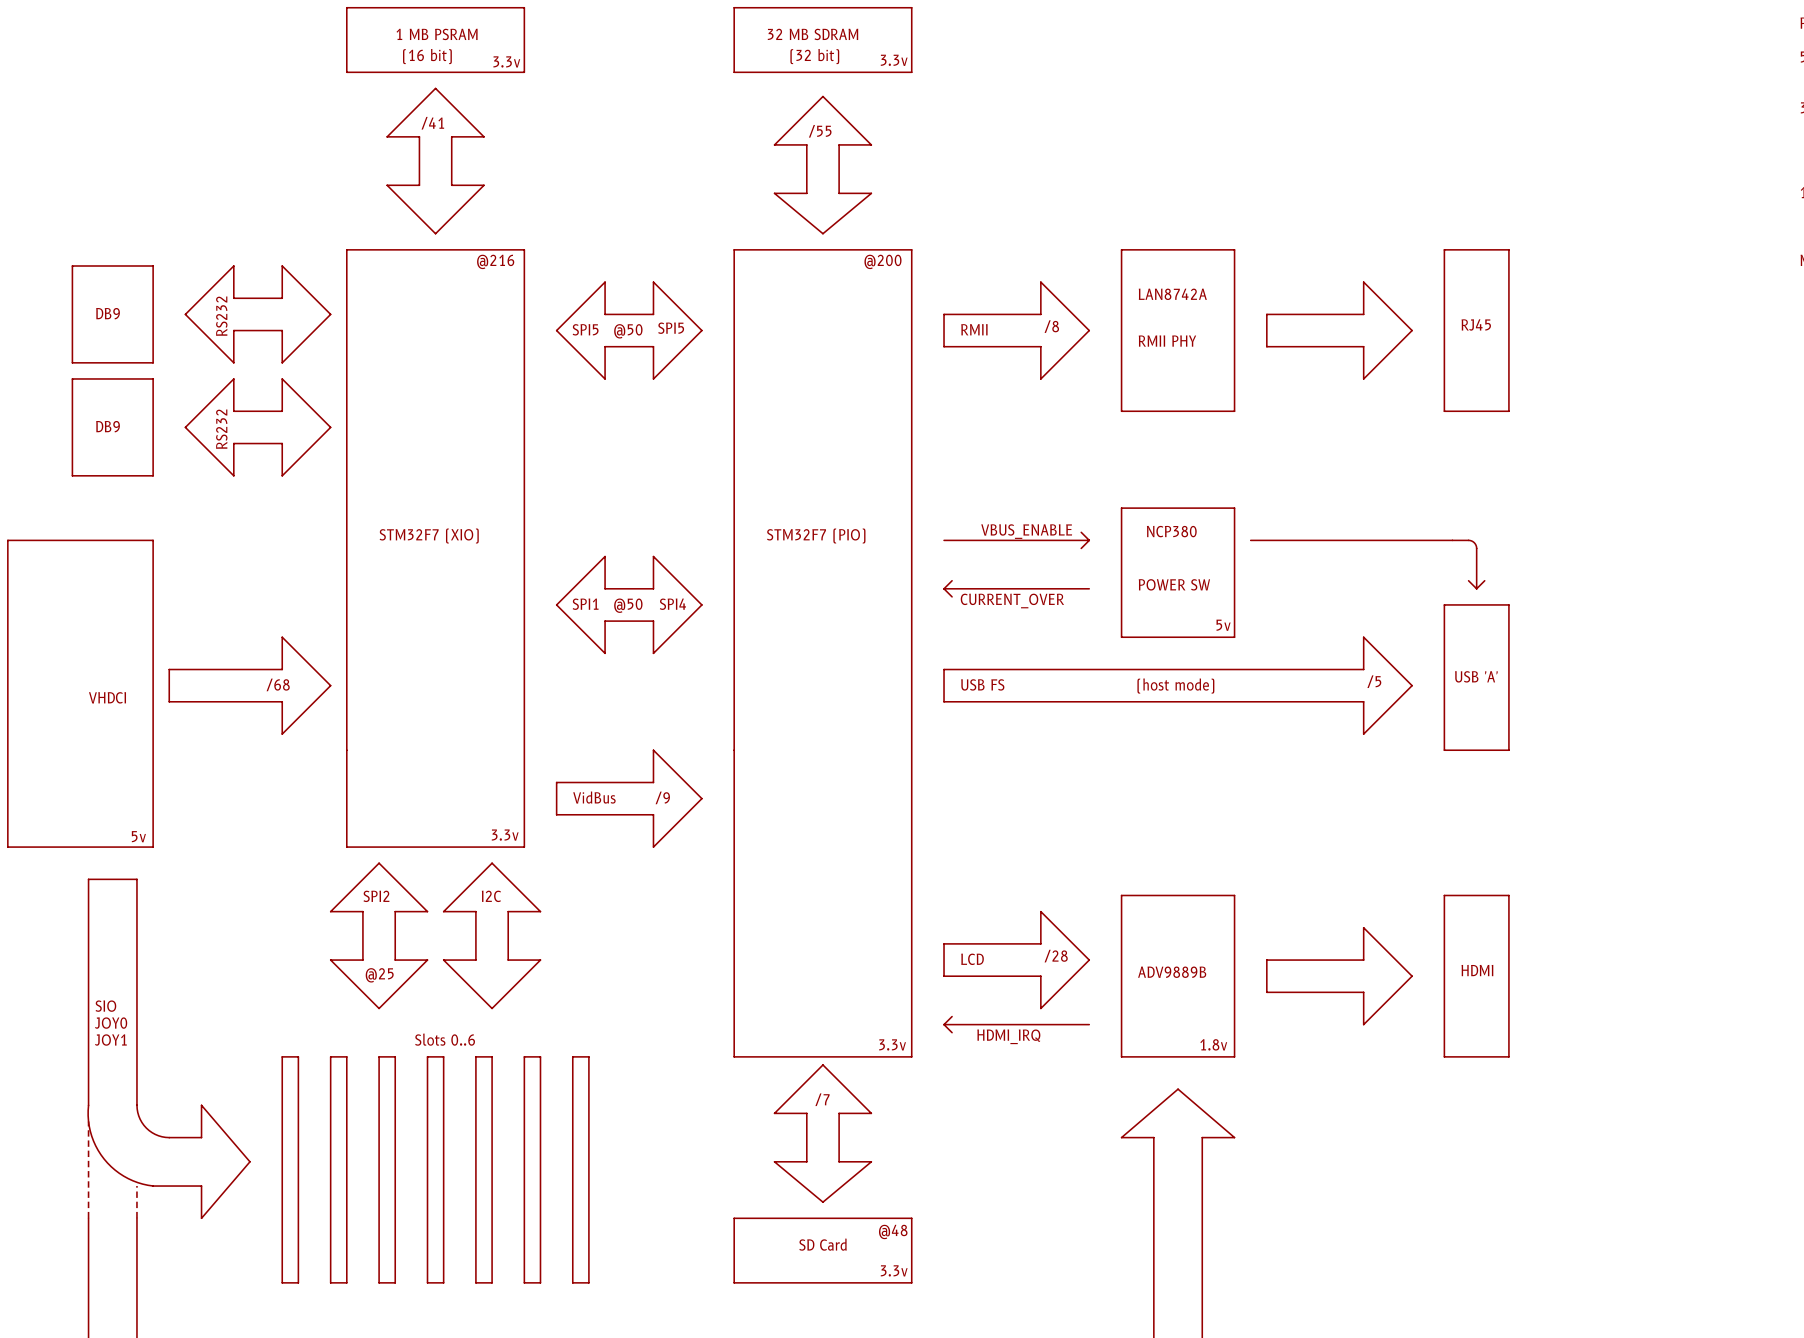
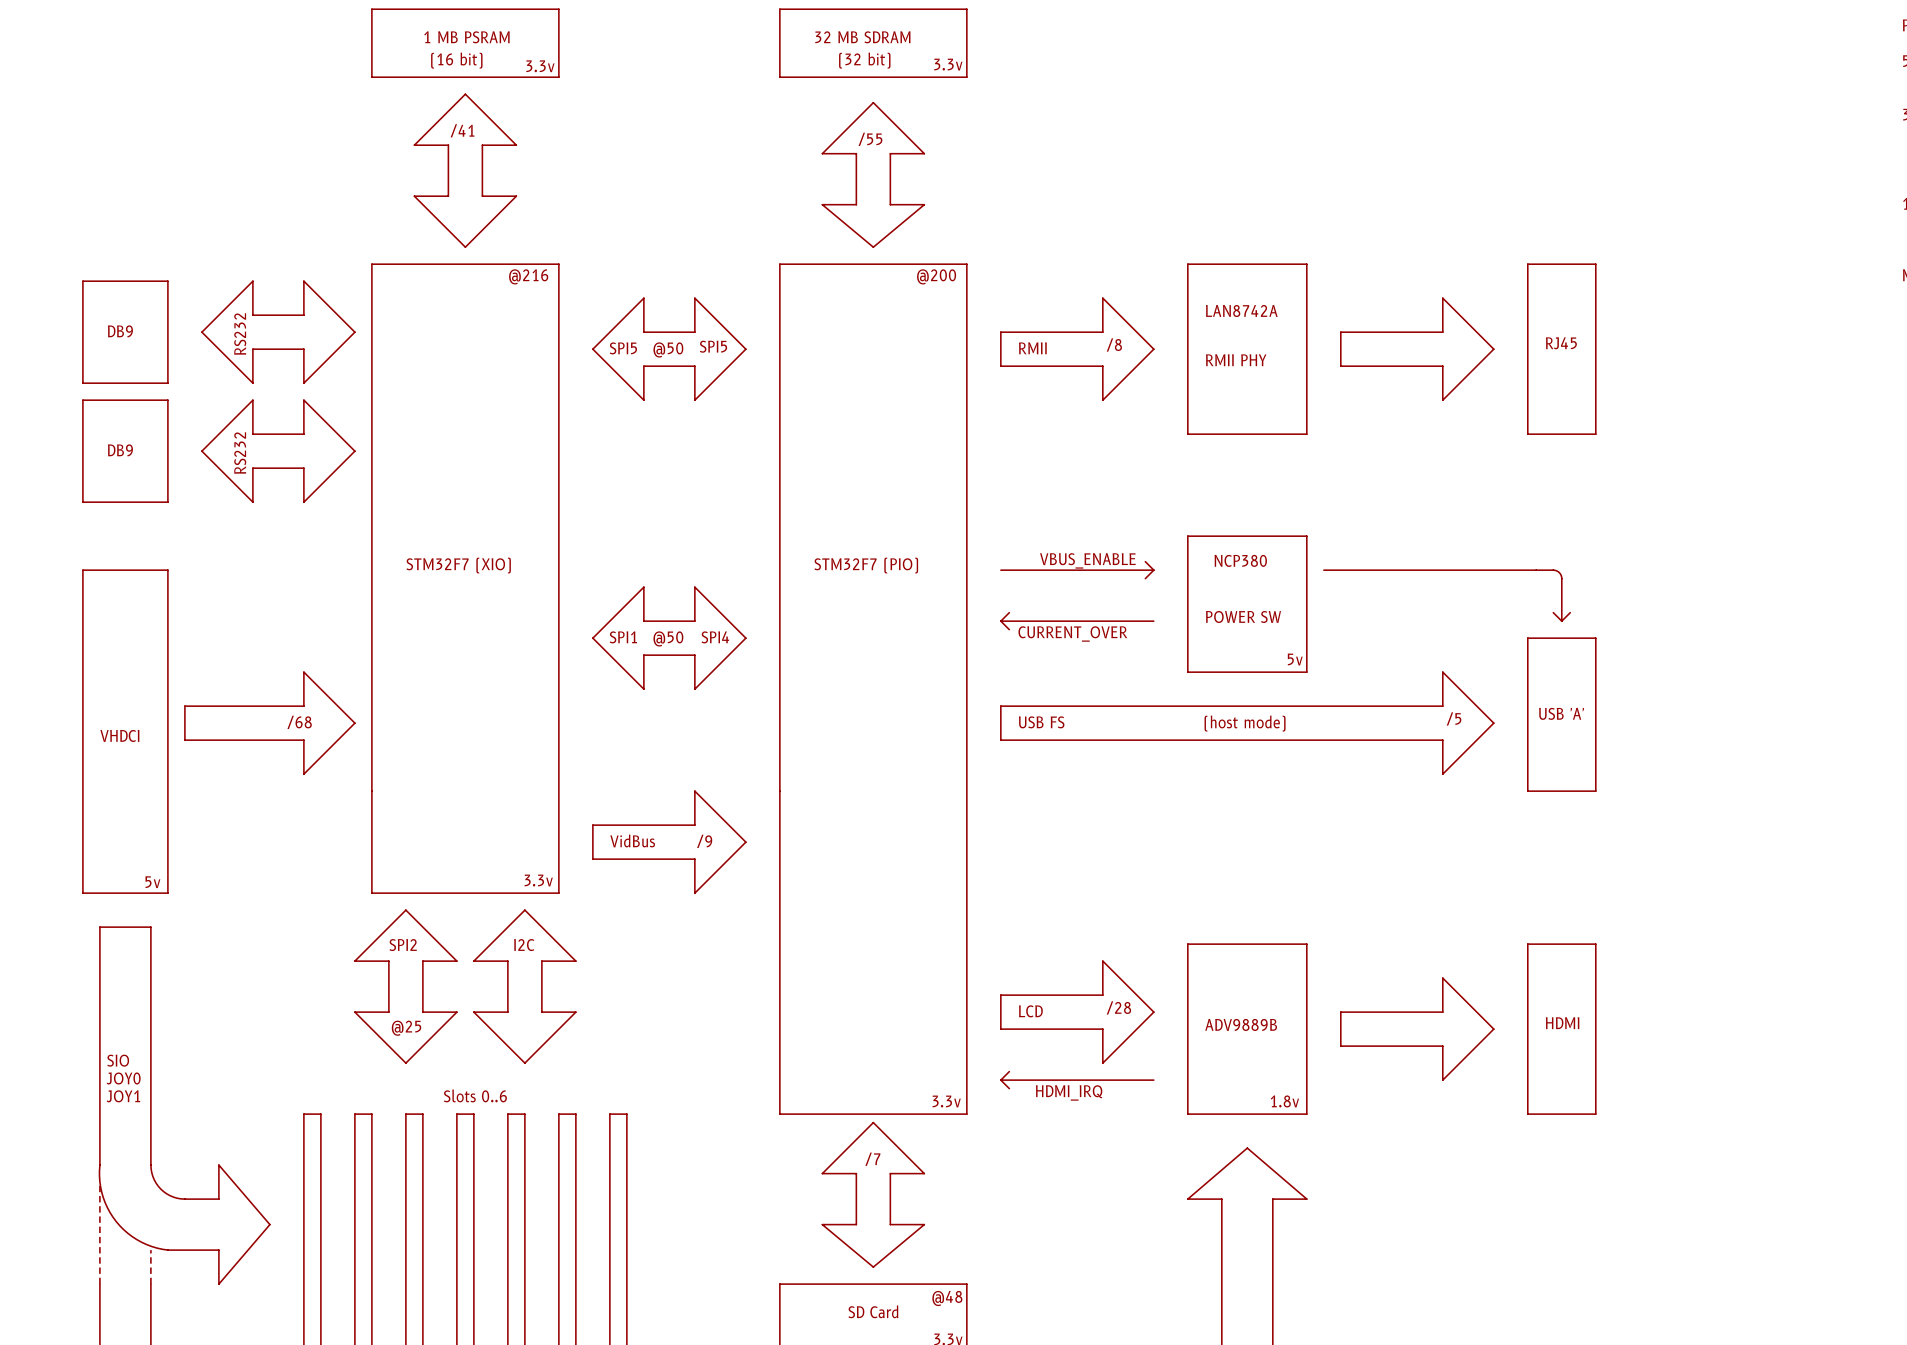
line: (72, 540) (7, 540) (7, 847) (72, 847) -> (82, 570) (82, 893)

